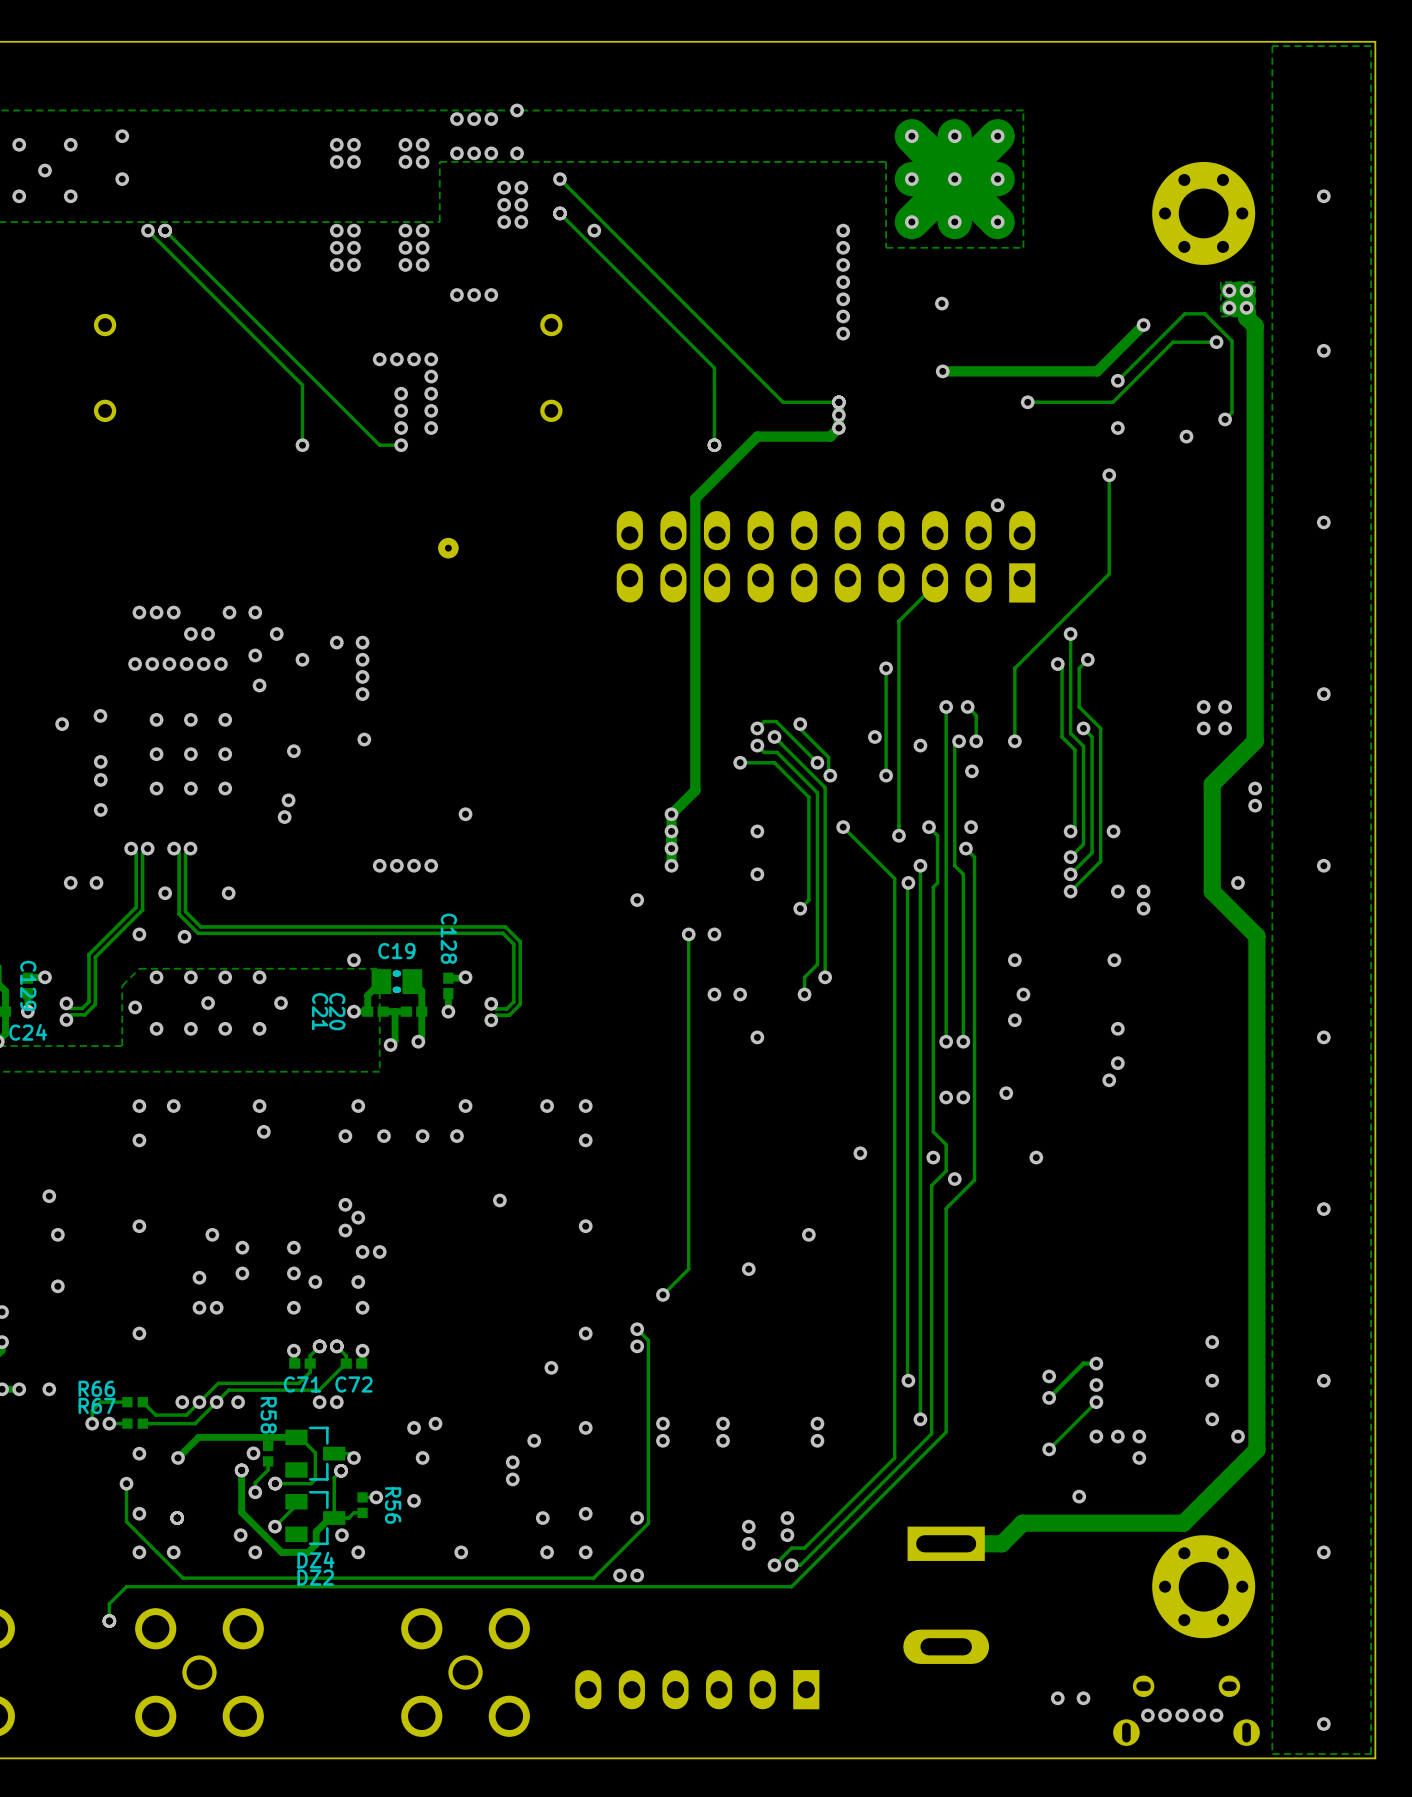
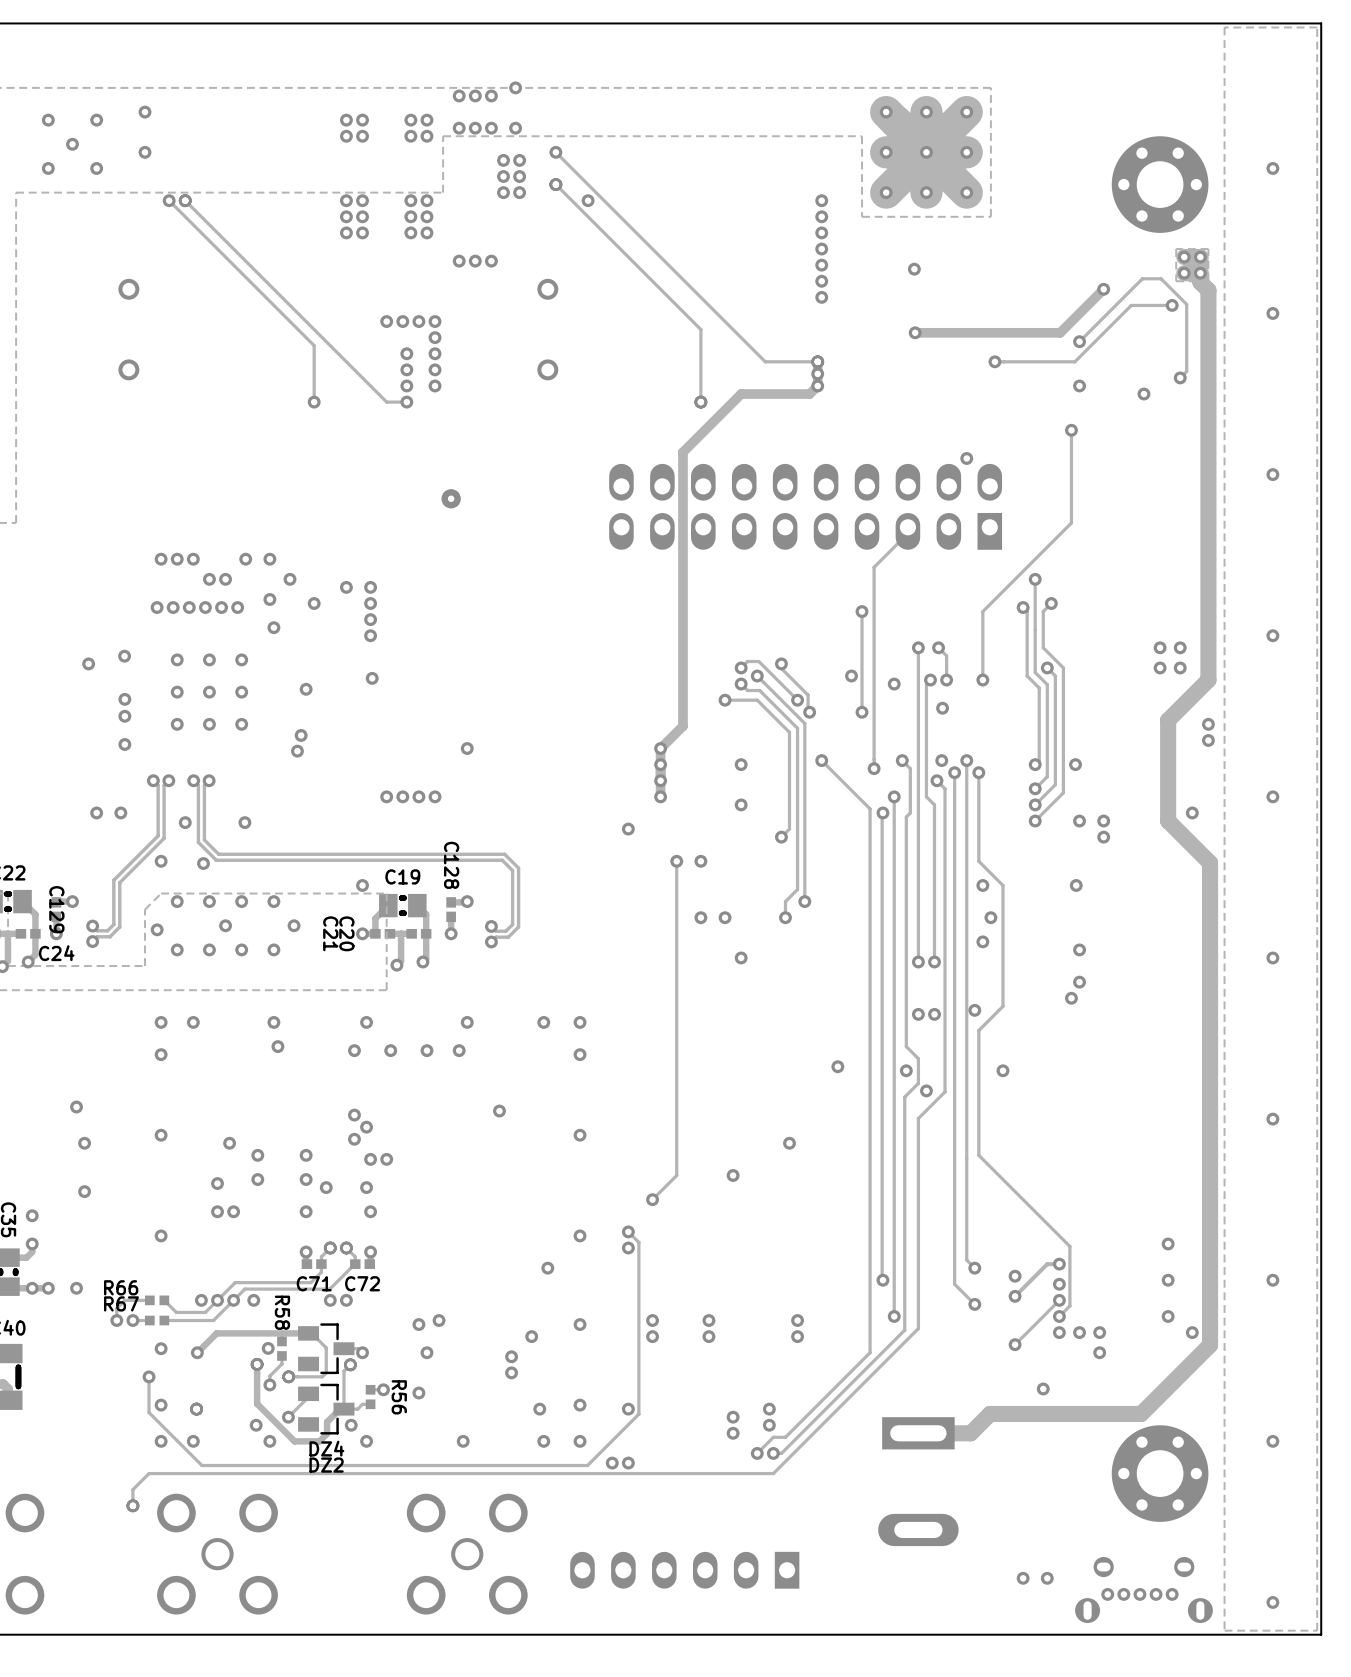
track: none -> (966, 760) (966, 1260) (974, 1268)
via: none -> (966, 760)
track: none -> (954, 772) (954, 1284) (974, 1304)
via: none -> (954, 772)
track: none -> (978, 772) (978, 861) (1002, 885) (1002, 1006) (978, 1030) (978, 1155) (1069, 1246) (1069, 1305) (1059, 1316)
via: none -> (978, 772)
via: none -> (974, 1268)
via: none -> (974, 1304)
via: none -> (1059, 1316)

